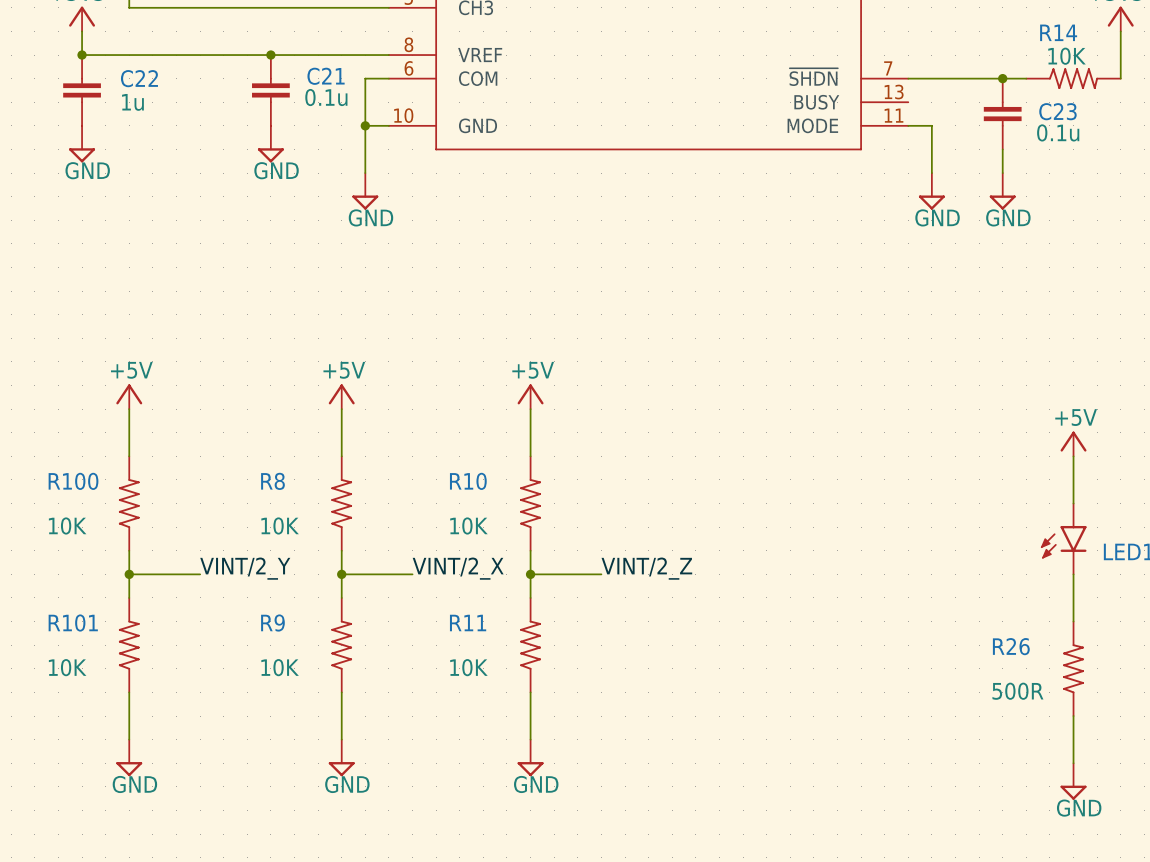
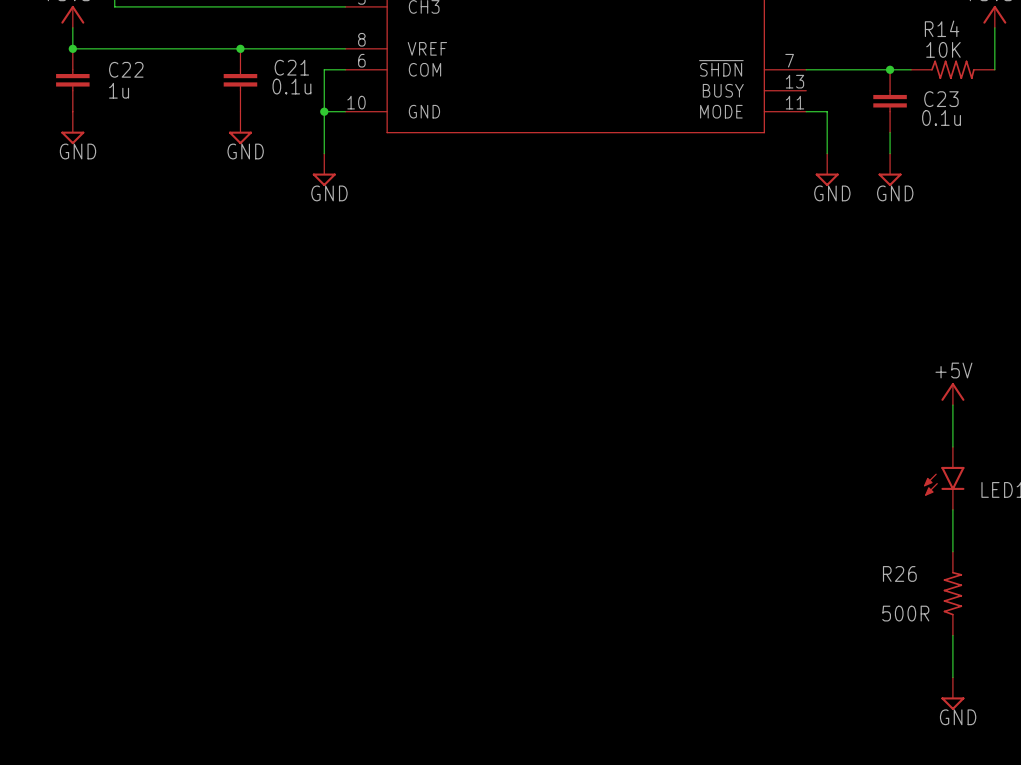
power symbol: +5V (129, 396) -> none
power symbol: +5V (341, 396) -> none
power symbol: +5V (530, 396) -> none
wire: (129, 409) (129, 456) -> none
wire: (341, 409) (341, 456) -> none
wire: (530, 409) (530, 456) -> none
R100: 10K (129, 503) -> none
R8: 10K (341, 503) -> none
R10: 10K (530, 503) -> none
wire: (129, 550) (129, 597) -> none
wire: (341, 550) (341, 597) -> none
wire: (530, 550) (530, 597) -> none
label: VINT/2_Y (245, 568) -> none
label: VINT/2_X (458, 568) -> none
label: VINT/2_Z (646, 568) -> none
wire: (129, 574) (200, 574) -> none
junction: (129, 574) -> none
wire: (341, 574) (412, 574) -> none
junction: (341, 574) -> none
wire: (530, 574) (601, 574) -> none
junction: (530, 574) -> none
R101: 10K (129, 645) -> none
R9: 10K (341, 645) -> none
R11: 10K (530, 645) -> none
wire: (129, 692) (129, 739) -> none
wire: (341, 692) (341, 739) -> none
wire: (530, 692) (530, 739) -> none
power symbol: GND (129, 757) -> none
power symbol: GND (341, 757) -> none
power symbol: GND (530, 757) -> none

